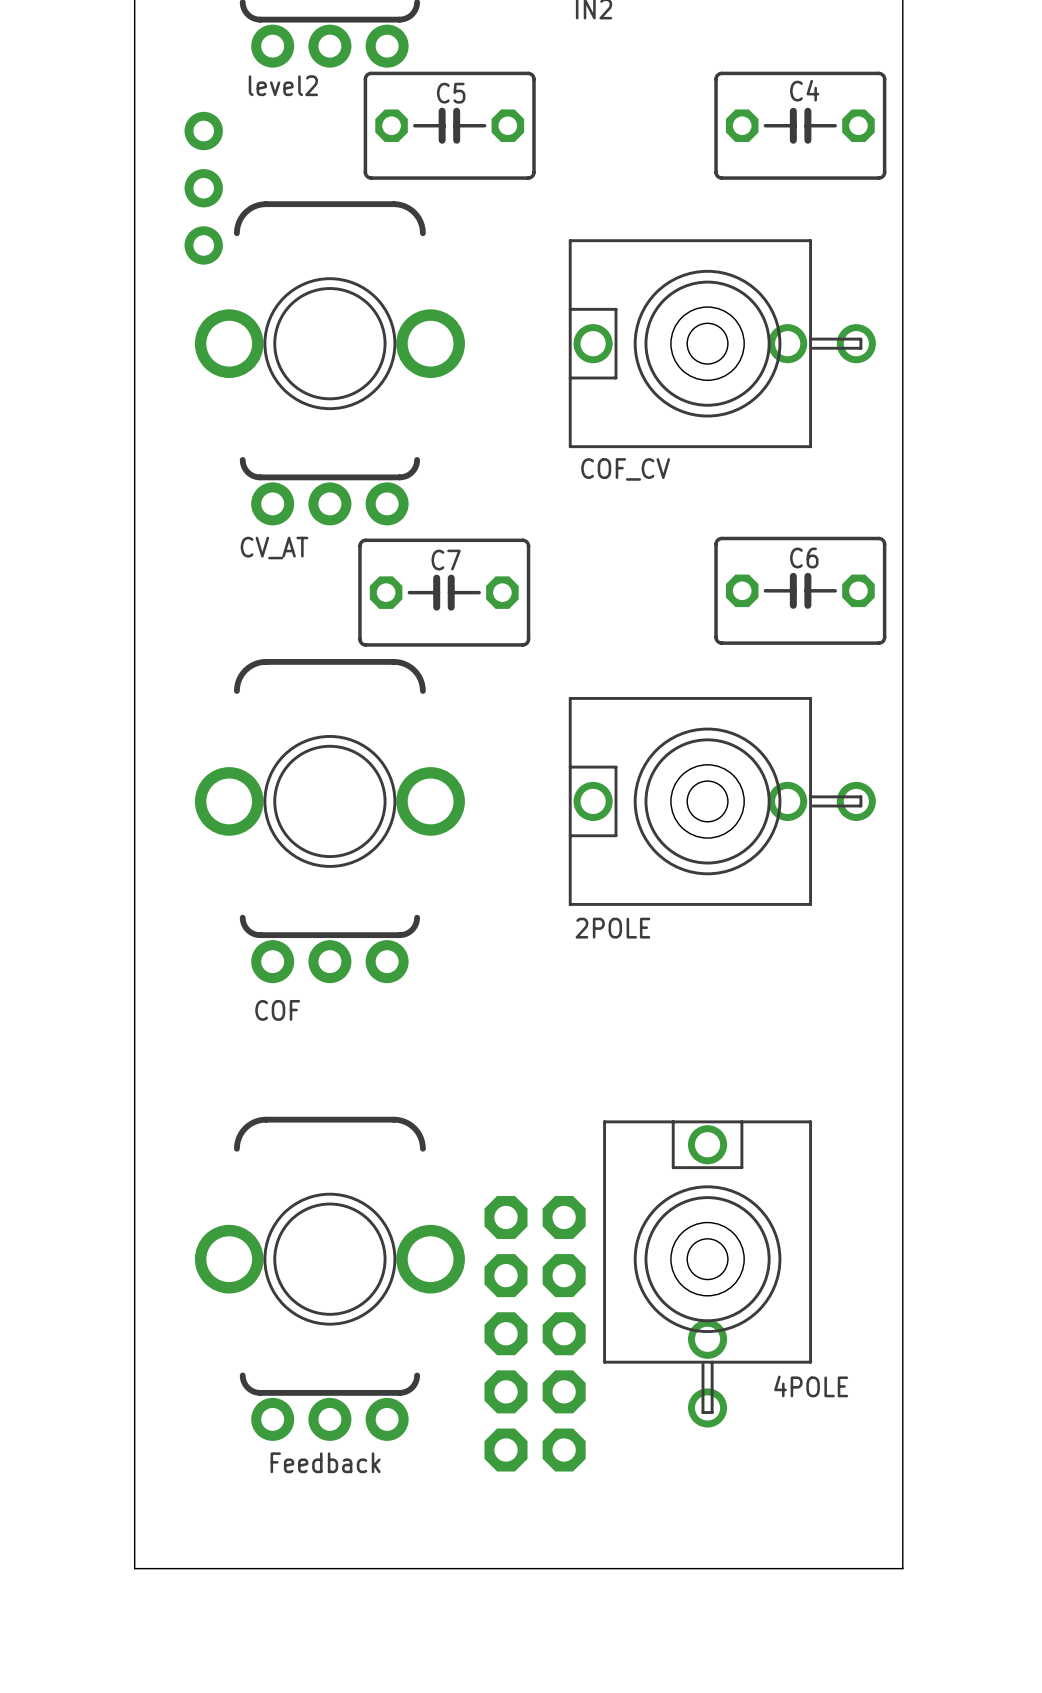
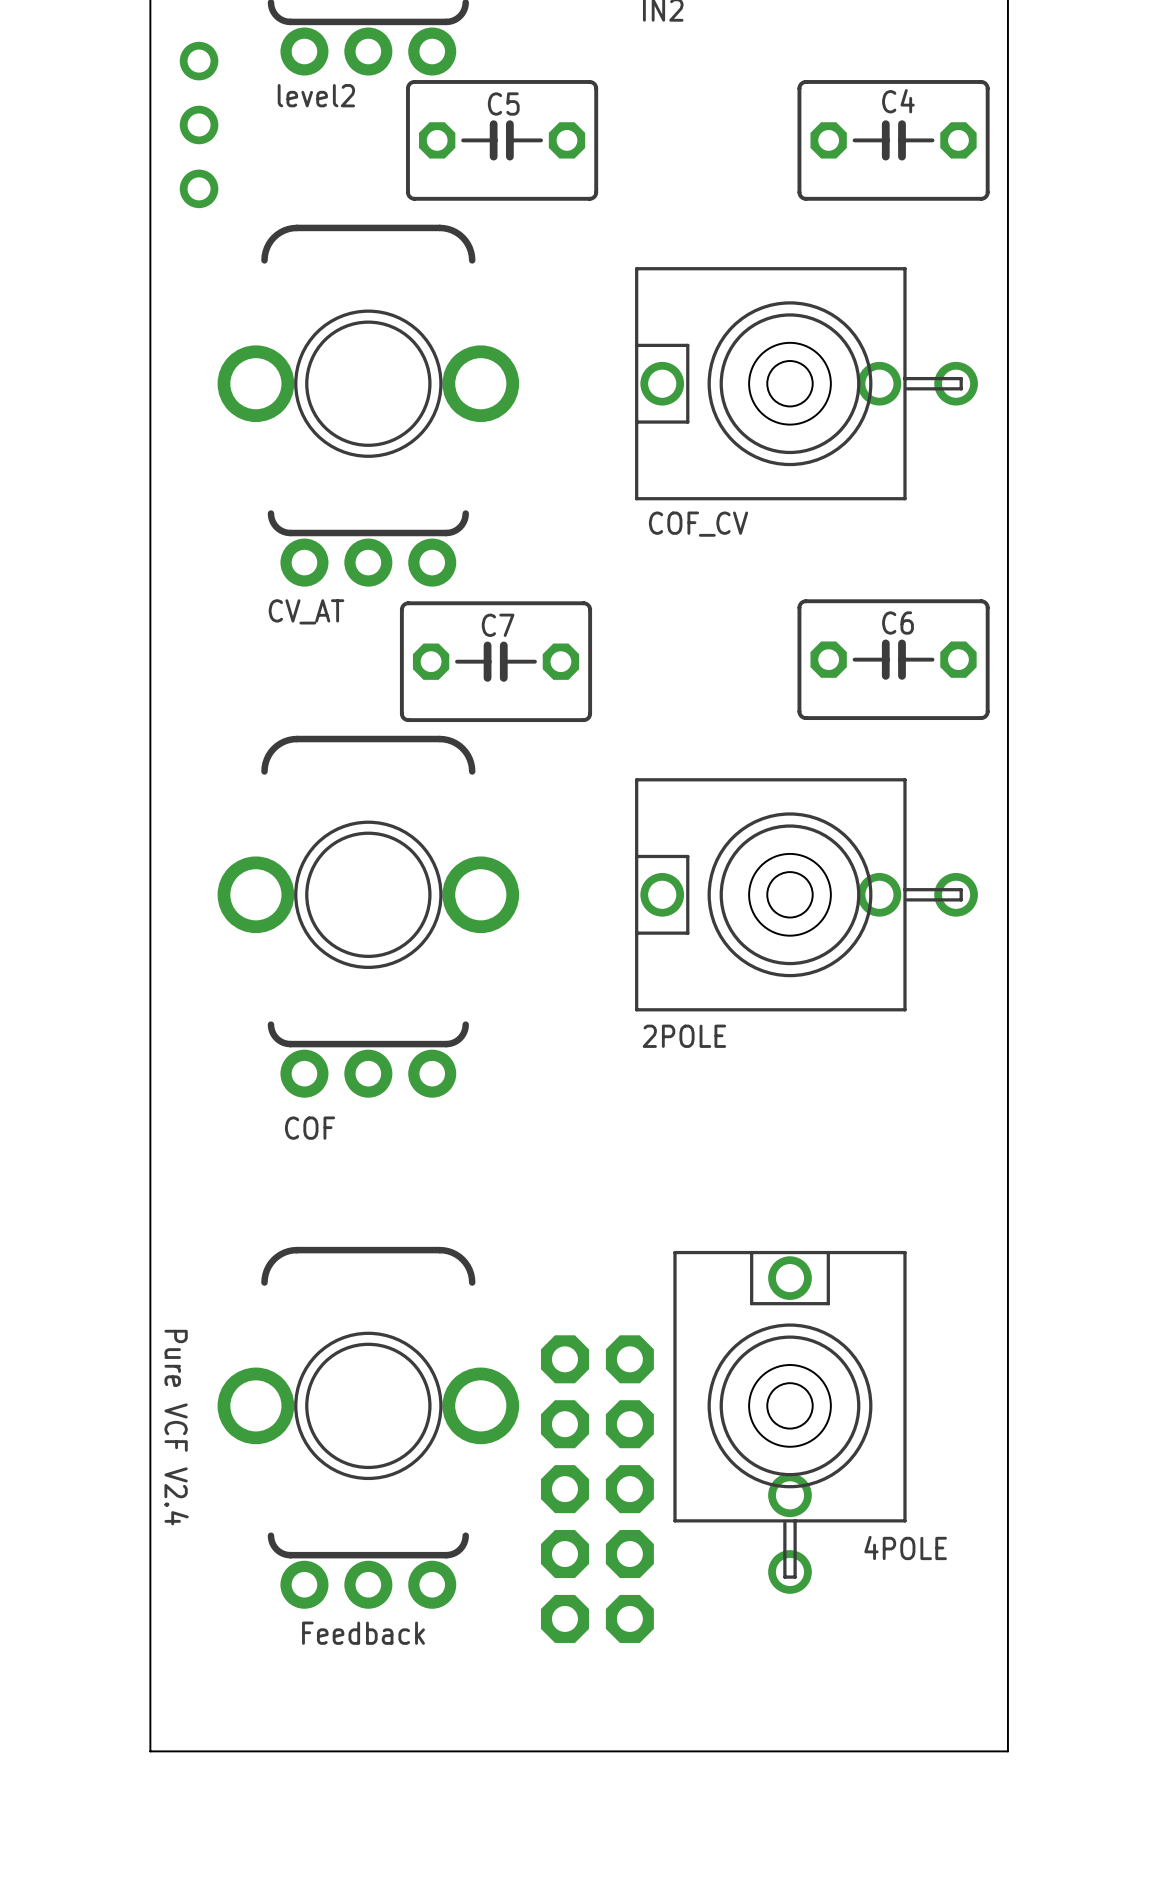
part: none -> (199, 124)
part: (203, 188) -> none
text: none -> Pure VCF V2.4 (176, 1427)

